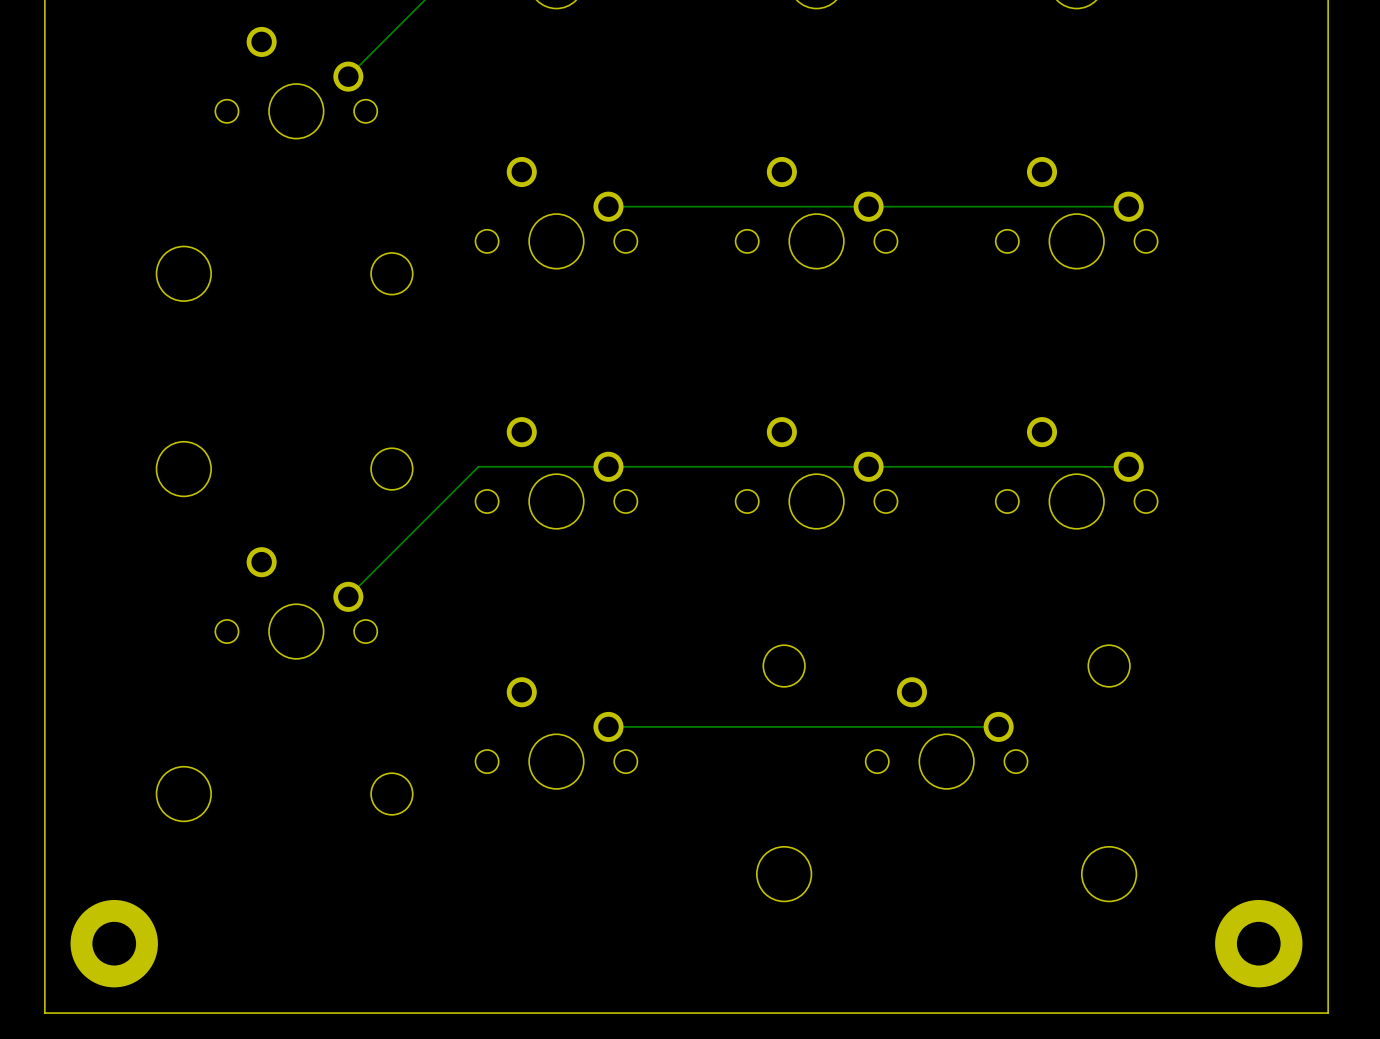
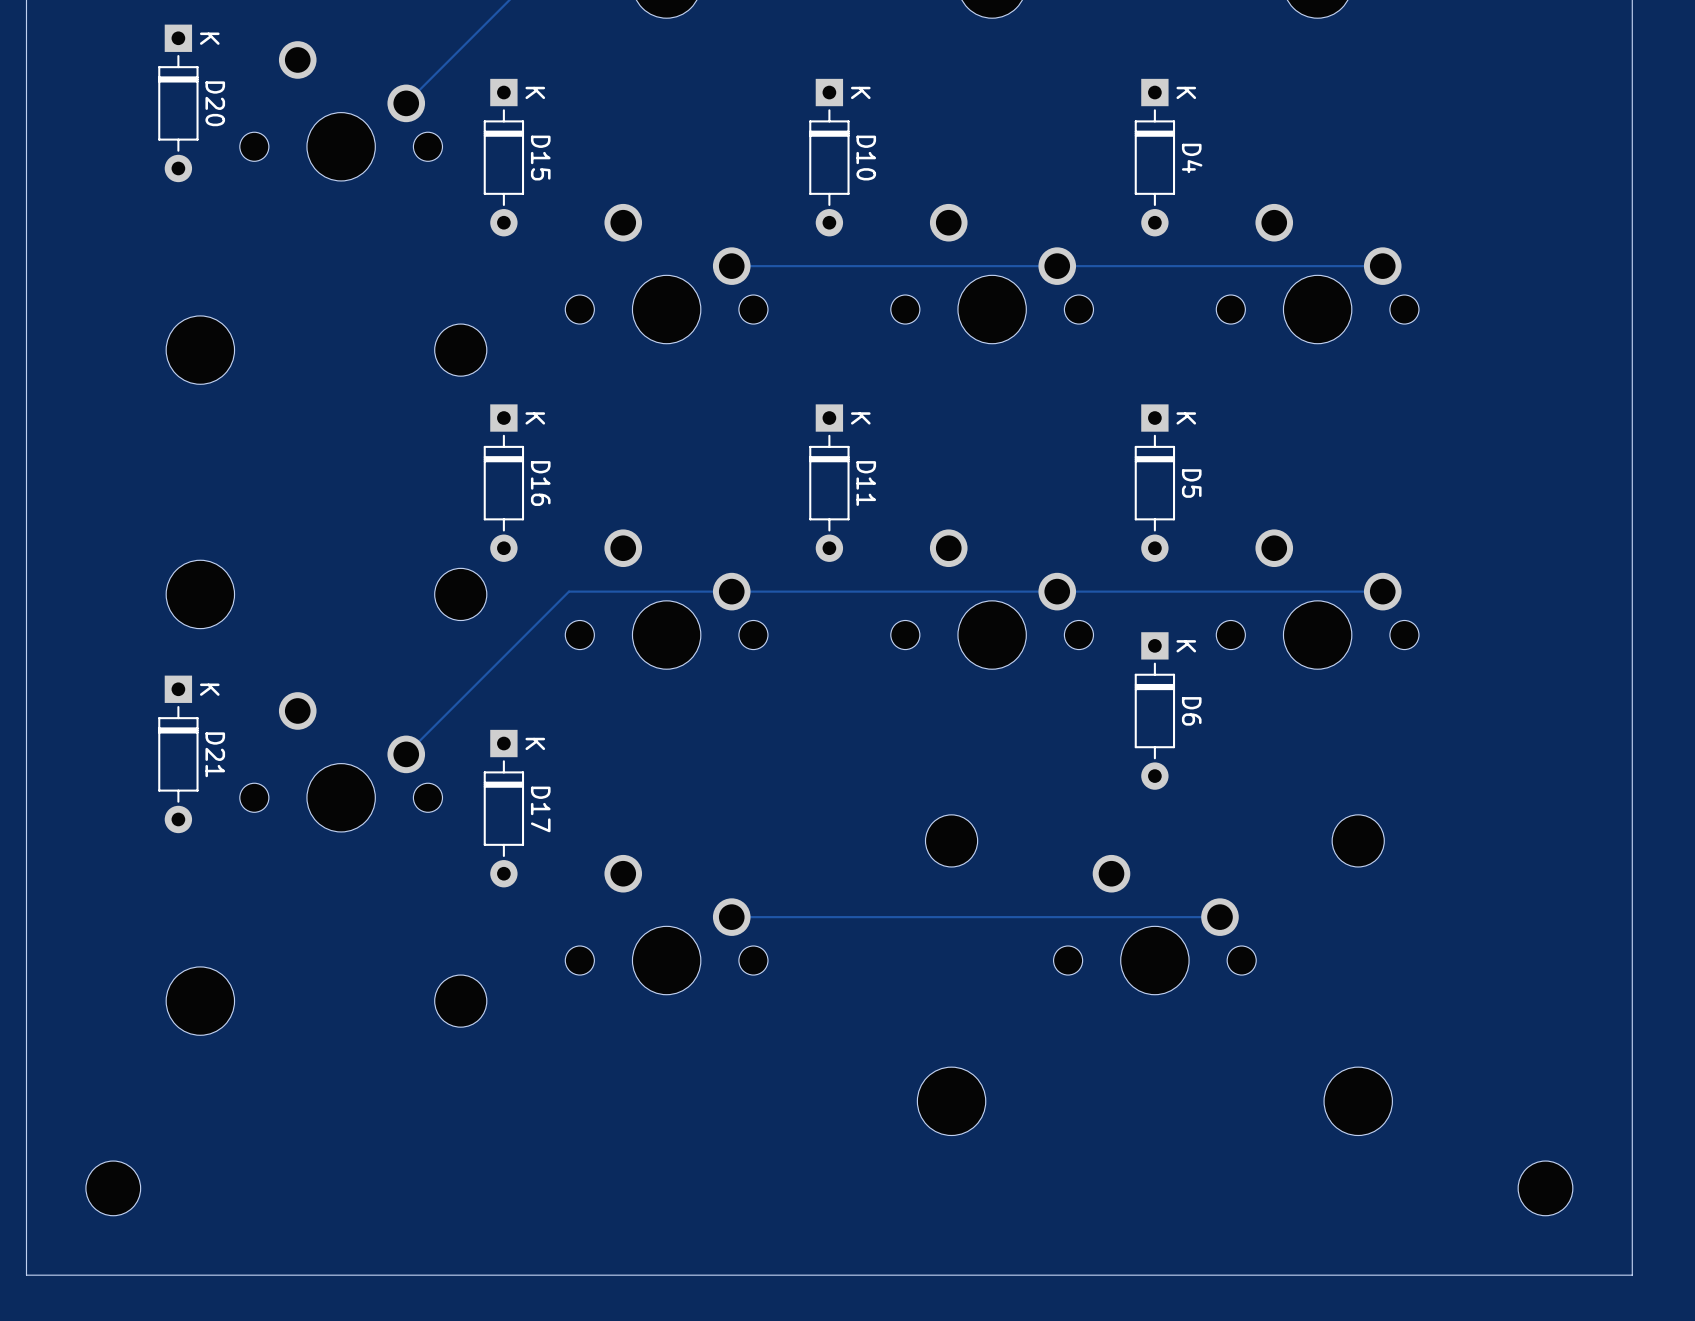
D20: none -> (178, 103)
D15: none -> (503, 157)
D10: none -> (829, 157)
D4: none -> (1154, 157)
D16: none -> (503, 483)
D11: none -> (829, 483)
D5: none -> (1154, 483)
D6: none -> (1154, 710)
D21: none -> (178, 754)
D17: none -> (503, 808)
part footprint: [70, 899, 158, 988] -> [85, 1161, 141, 1216]
part footprint: [1215, 899, 1303, 988] -> [1518, 1161, 1573, 1216]

